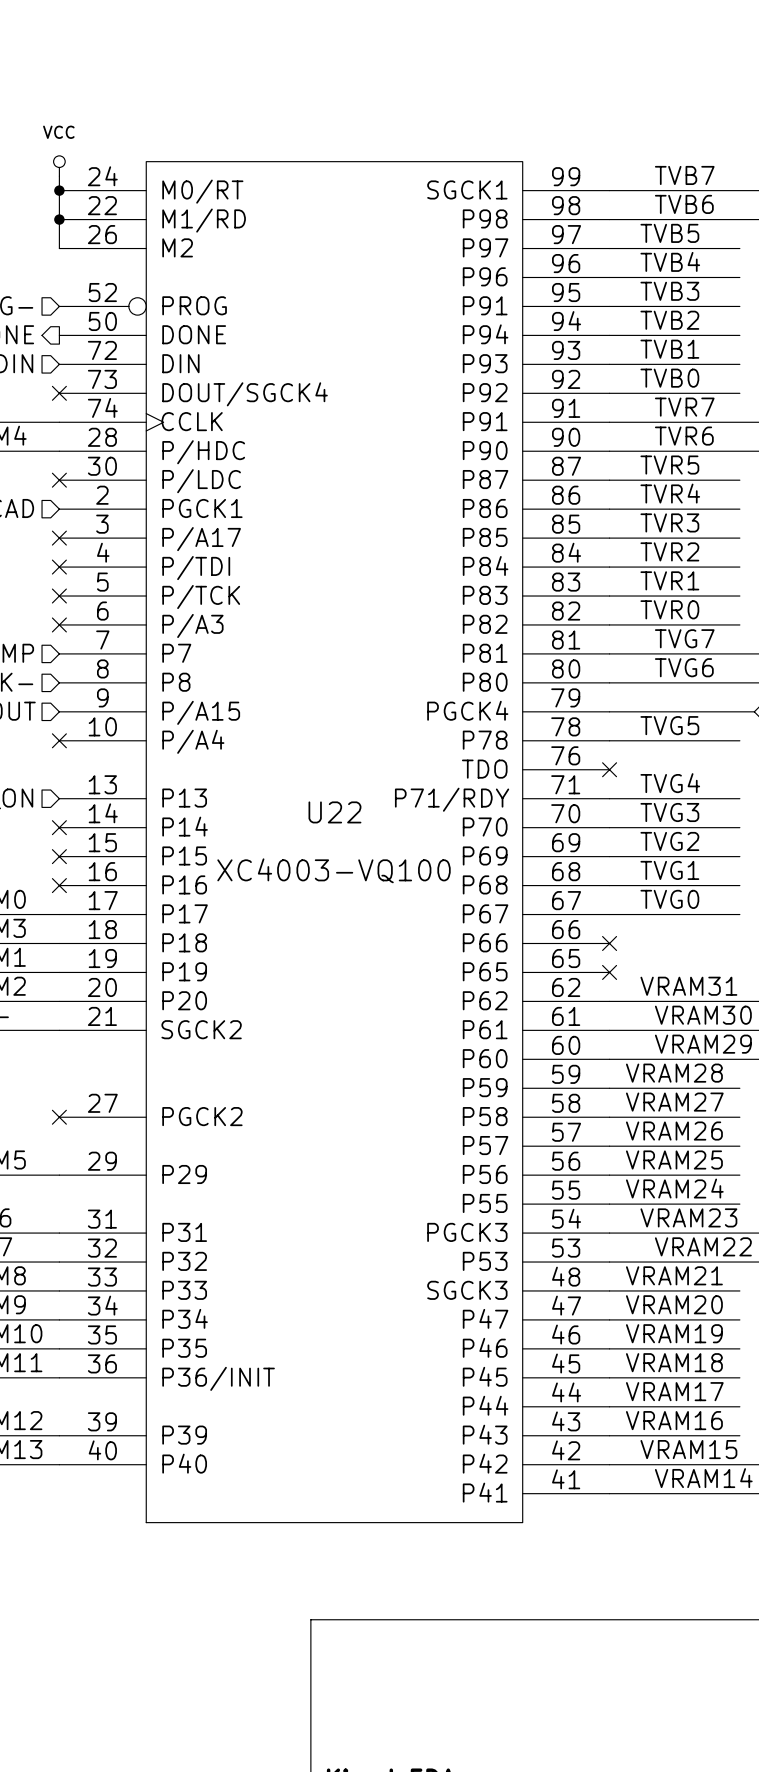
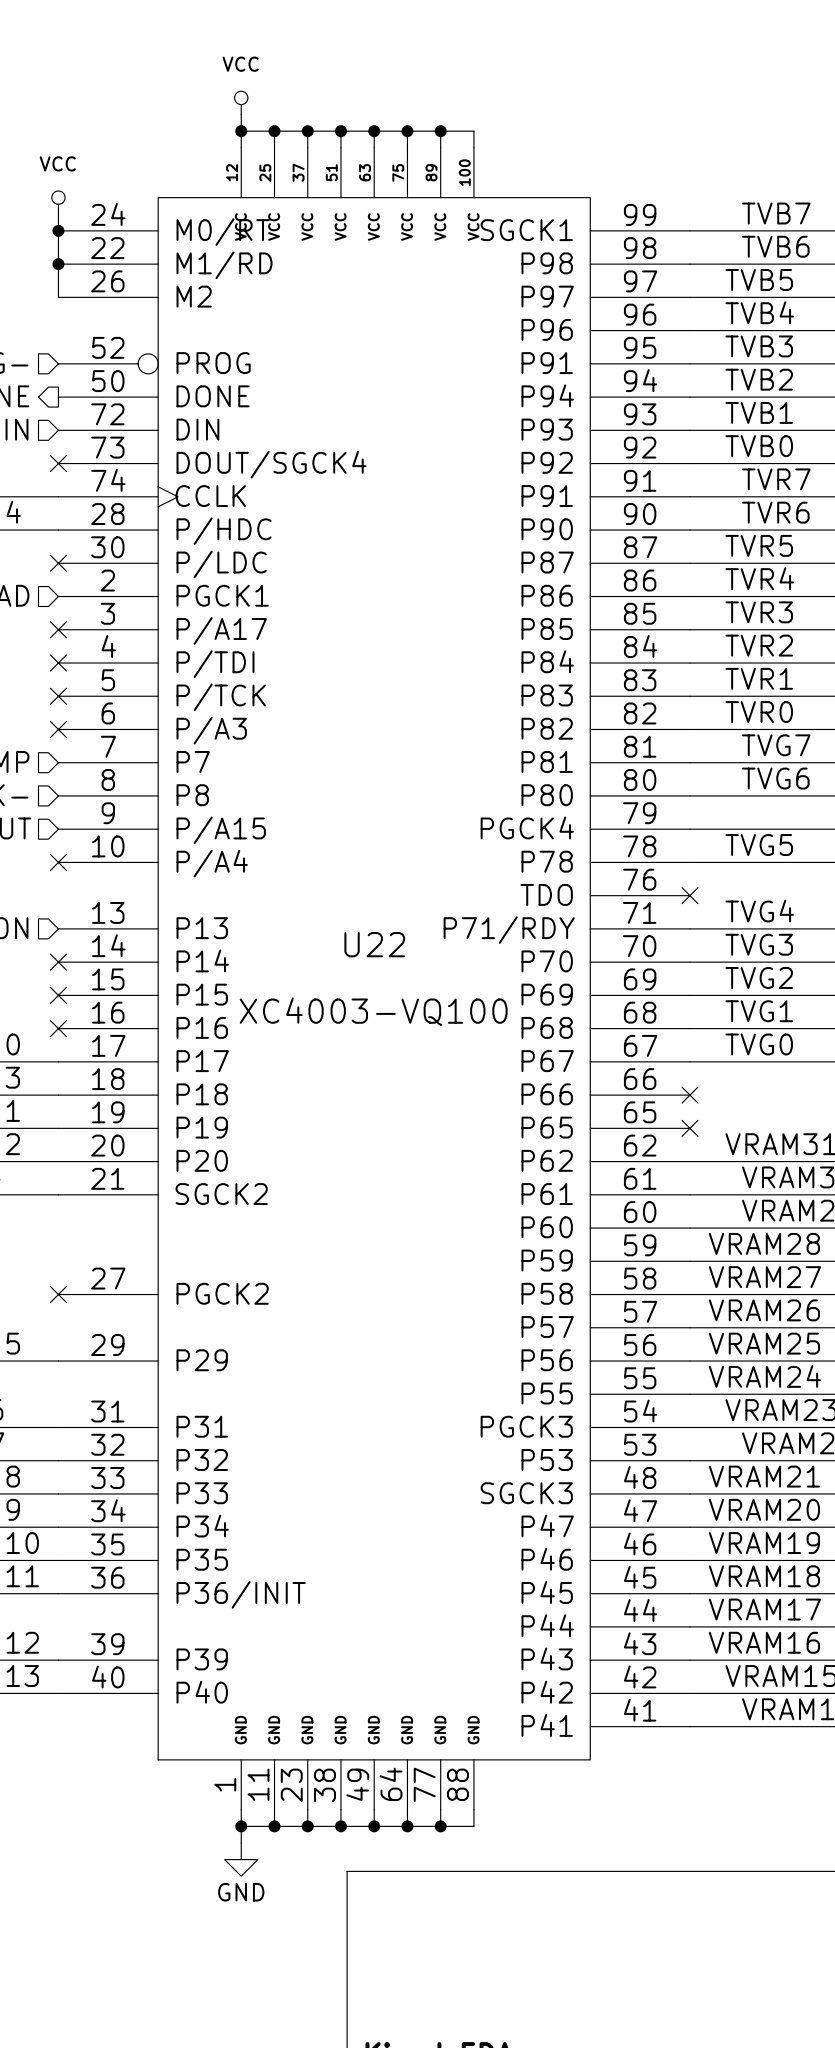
power symbol: none -> VCC (241, 102)
wire: none -> (241, 114) (241, 147)
wire: none -> (241, 131) (473, 131) (473, 147)
junction: none -> (241, 131)
wire: none -> (274, 131) (274, 147)
junction: none -> (274, 131)
wire: none -> (307, 131) (307, 147)
junction: none -> (307, 131)
wire: none -> (340, 131) (340, 147)
junction: none -> (340, 131)
wire: none -> (374, 131) (374, 147)
junction: none -> (374, 131)
wire: none -> (407, 131) (407, 147)
junction: none -> (407, 131)
wire: none -> (440, 131) (440, 147)
junction: none -> (440, 131)
U22 symbol: [59, 161, 610, 1523] -> [58, 147, 690, 1810]
wire: none -> (241, 1809) (241, 1842)
wire: none -> (274, 1809) (274, 1826)
wire: none -> (307, 1809) (307, 1826)
wire: none -> (340, 1809) (340, 1826)
wire: none -> (374, 1809) (374, 1826)
wire: none -> (407, 1809) (407, 1826)
wire: none -> (440, 1809) (440, 1826)
wire: none -> (473, 1809) (473, 1826) (241, 1826)
junction: none -> (241, 1826)
junction: none -> (274, 1826)
junction: none -> (307, 1826)
junction: none -> (340, 1826)
junction: none -> (374, 1826)
junction: none -> (407, 1826)
junction: none -> (440, 1826)
power symbol: none -> GND (241, 1859)

